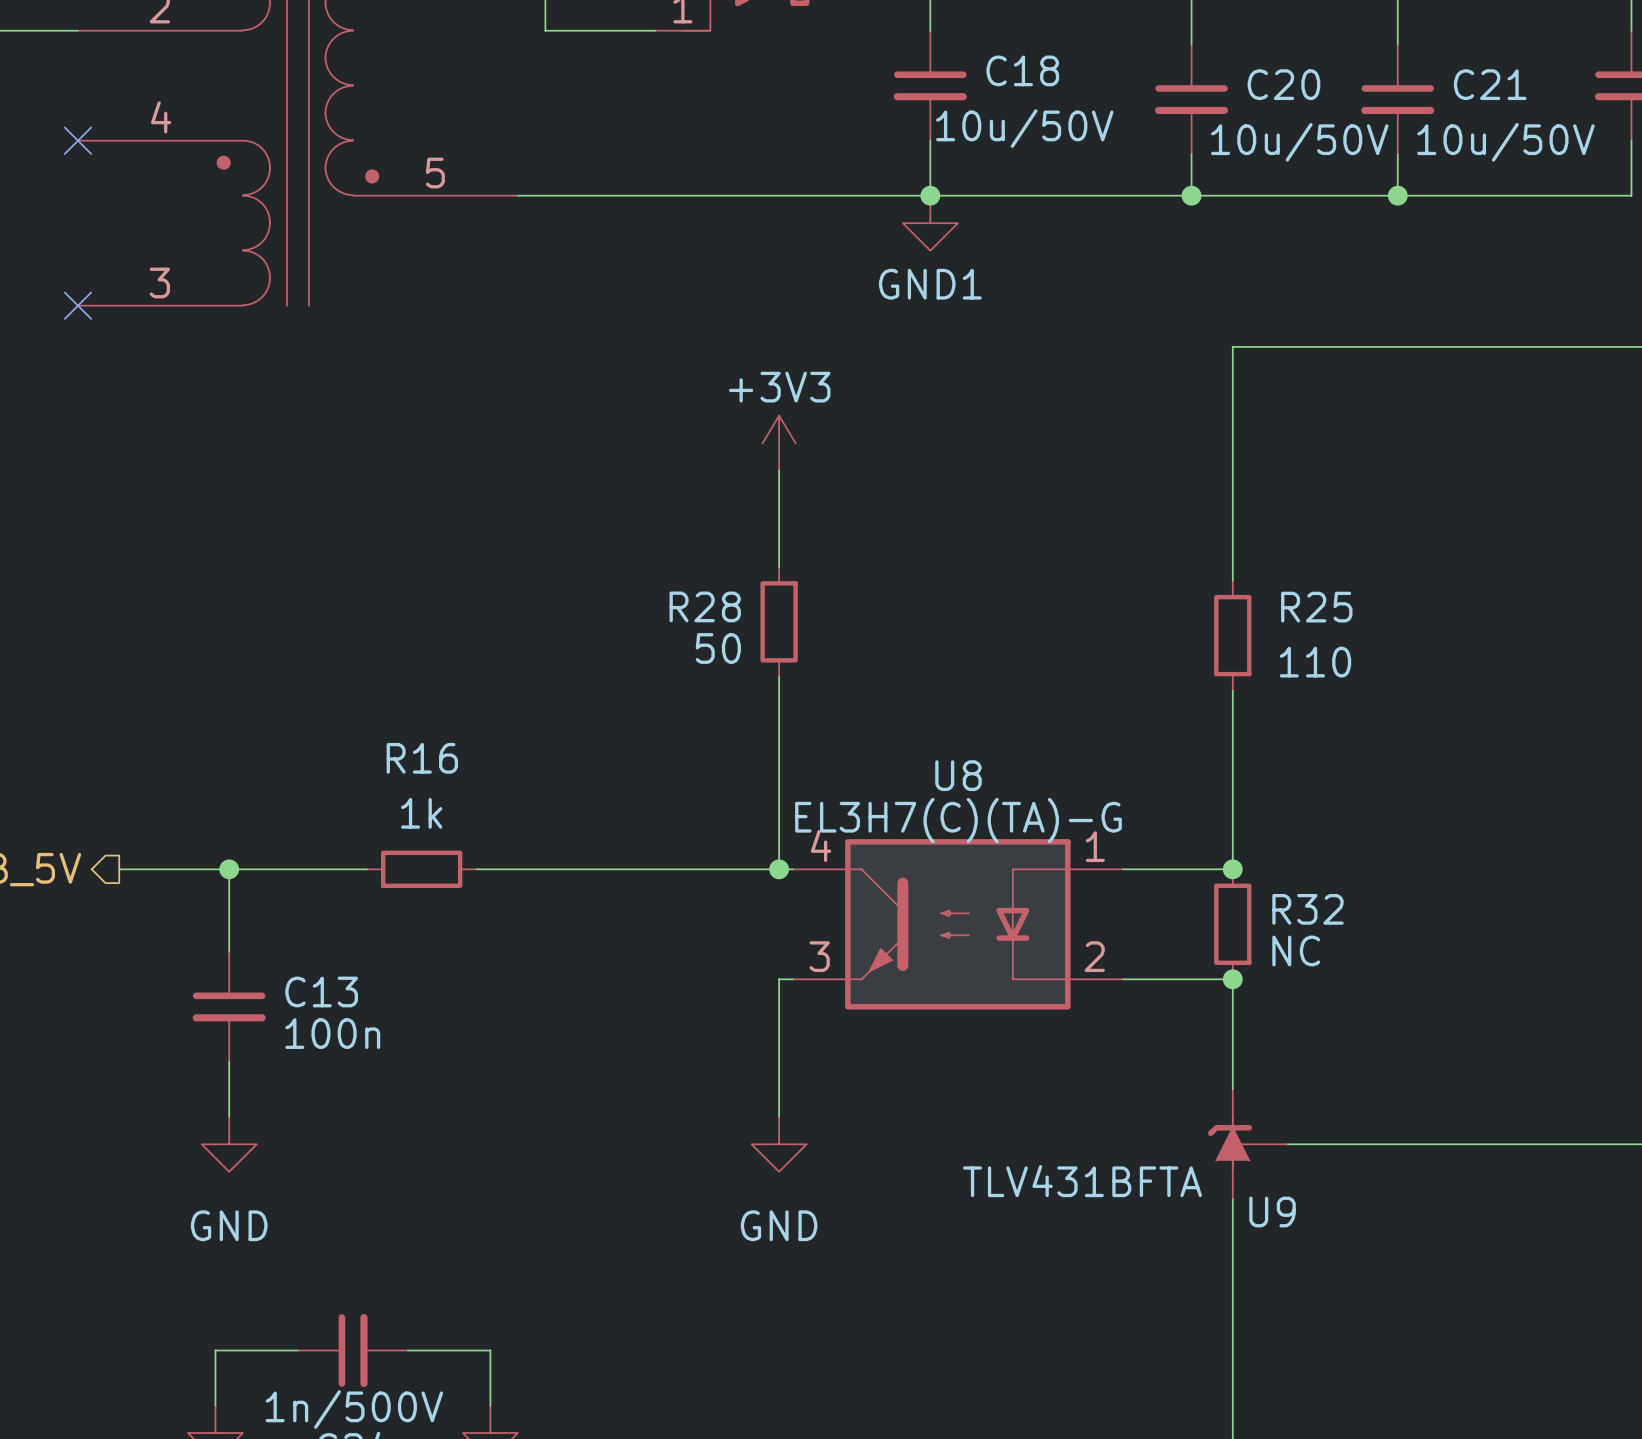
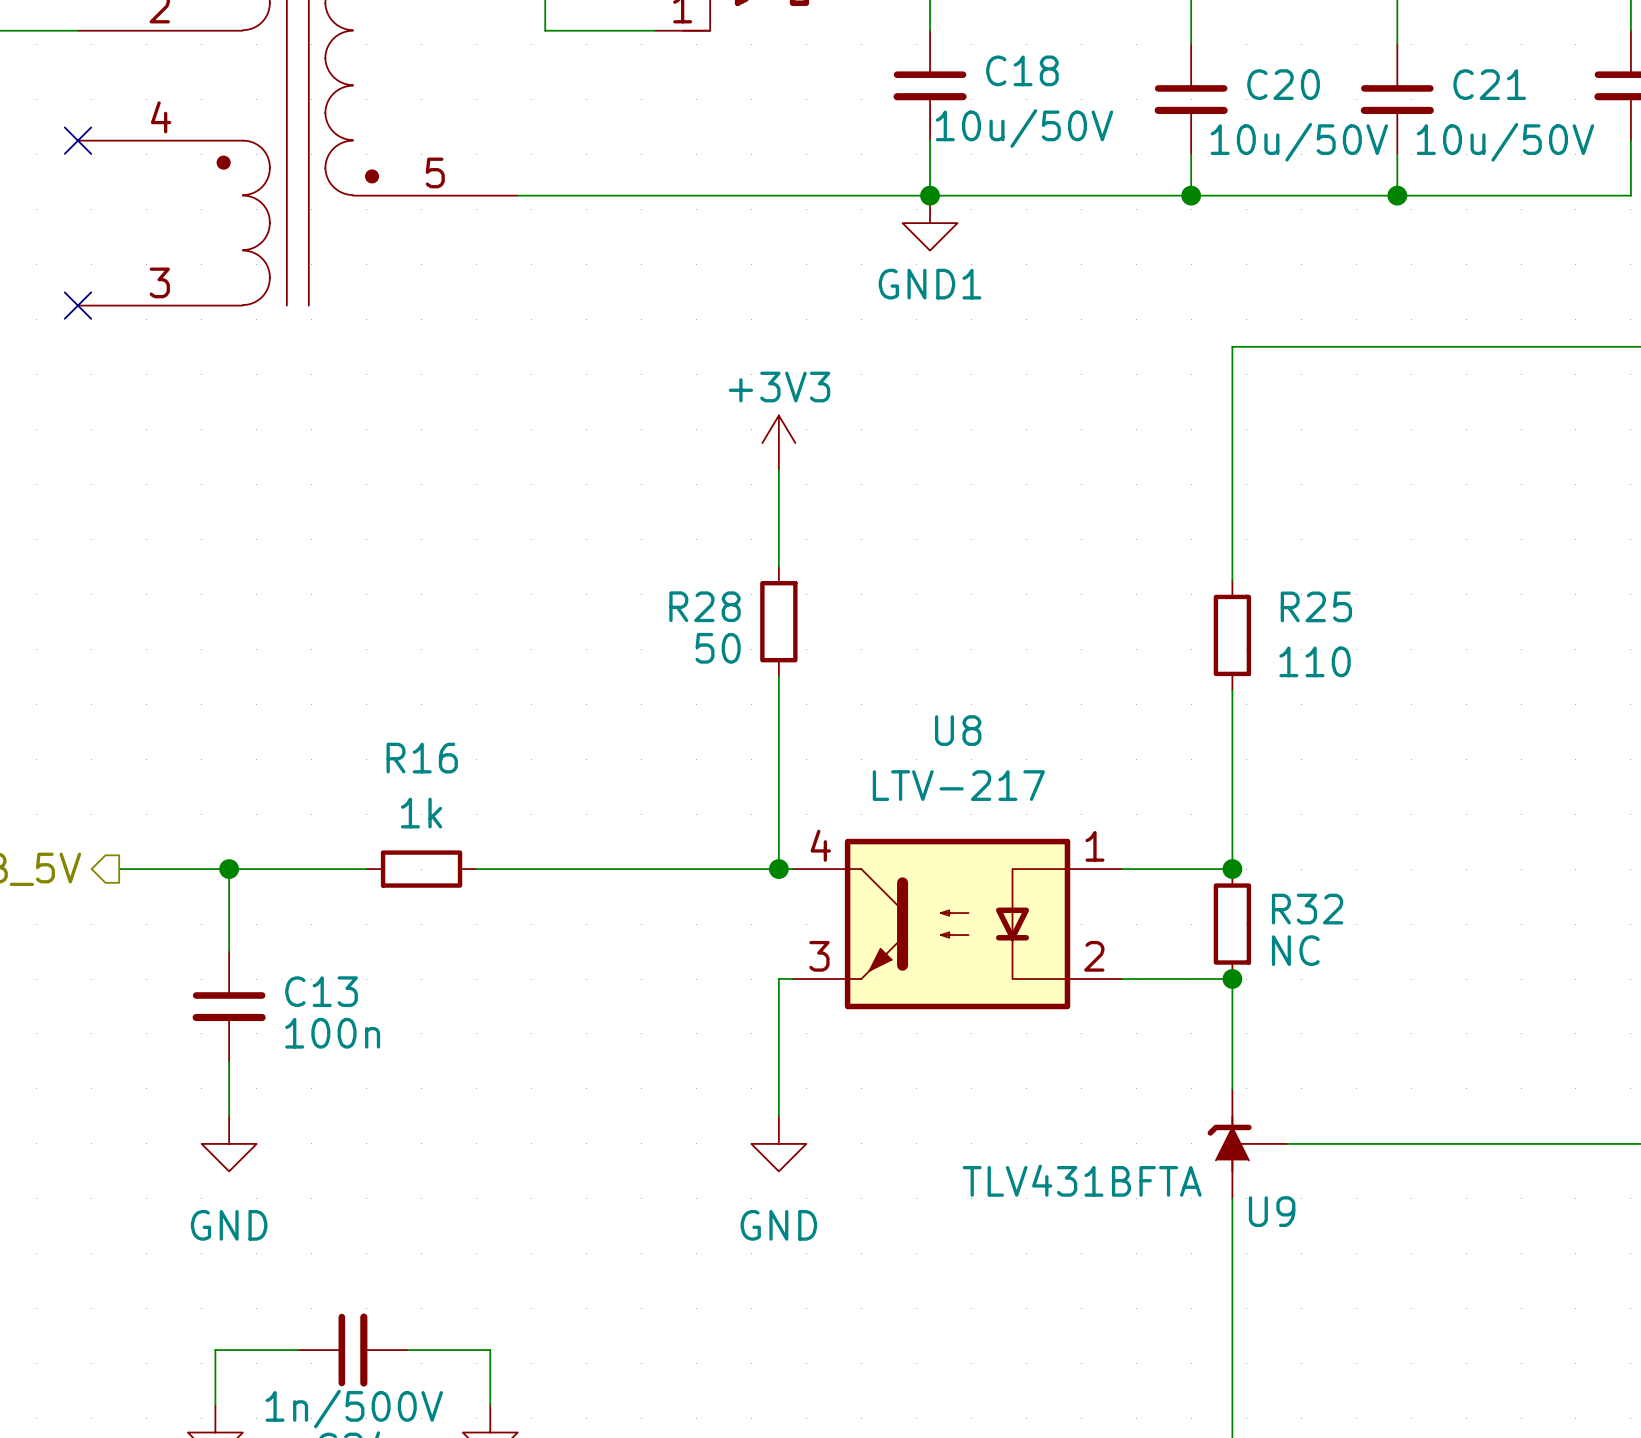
U8 name position: U8 (958, 775) -> U8 (958, 730)
U8 value: EL3H7(C)(TA)-G (958, 820) -> LTV-217 (958, 785)

